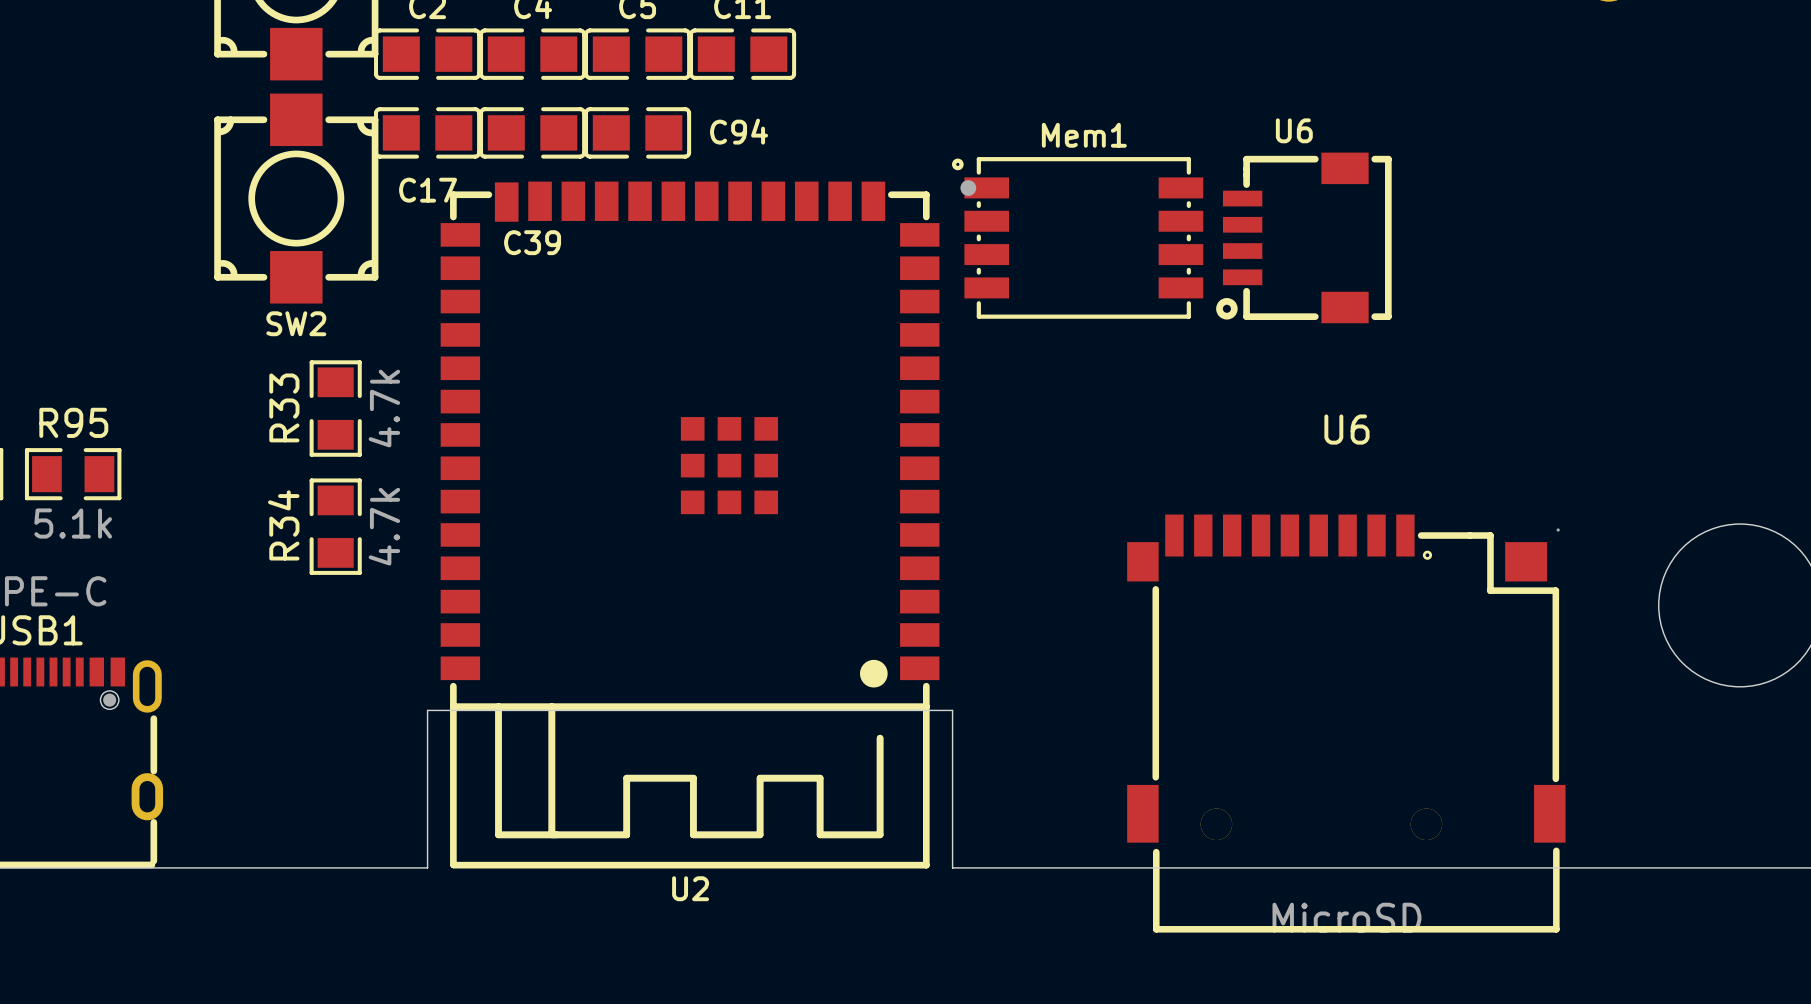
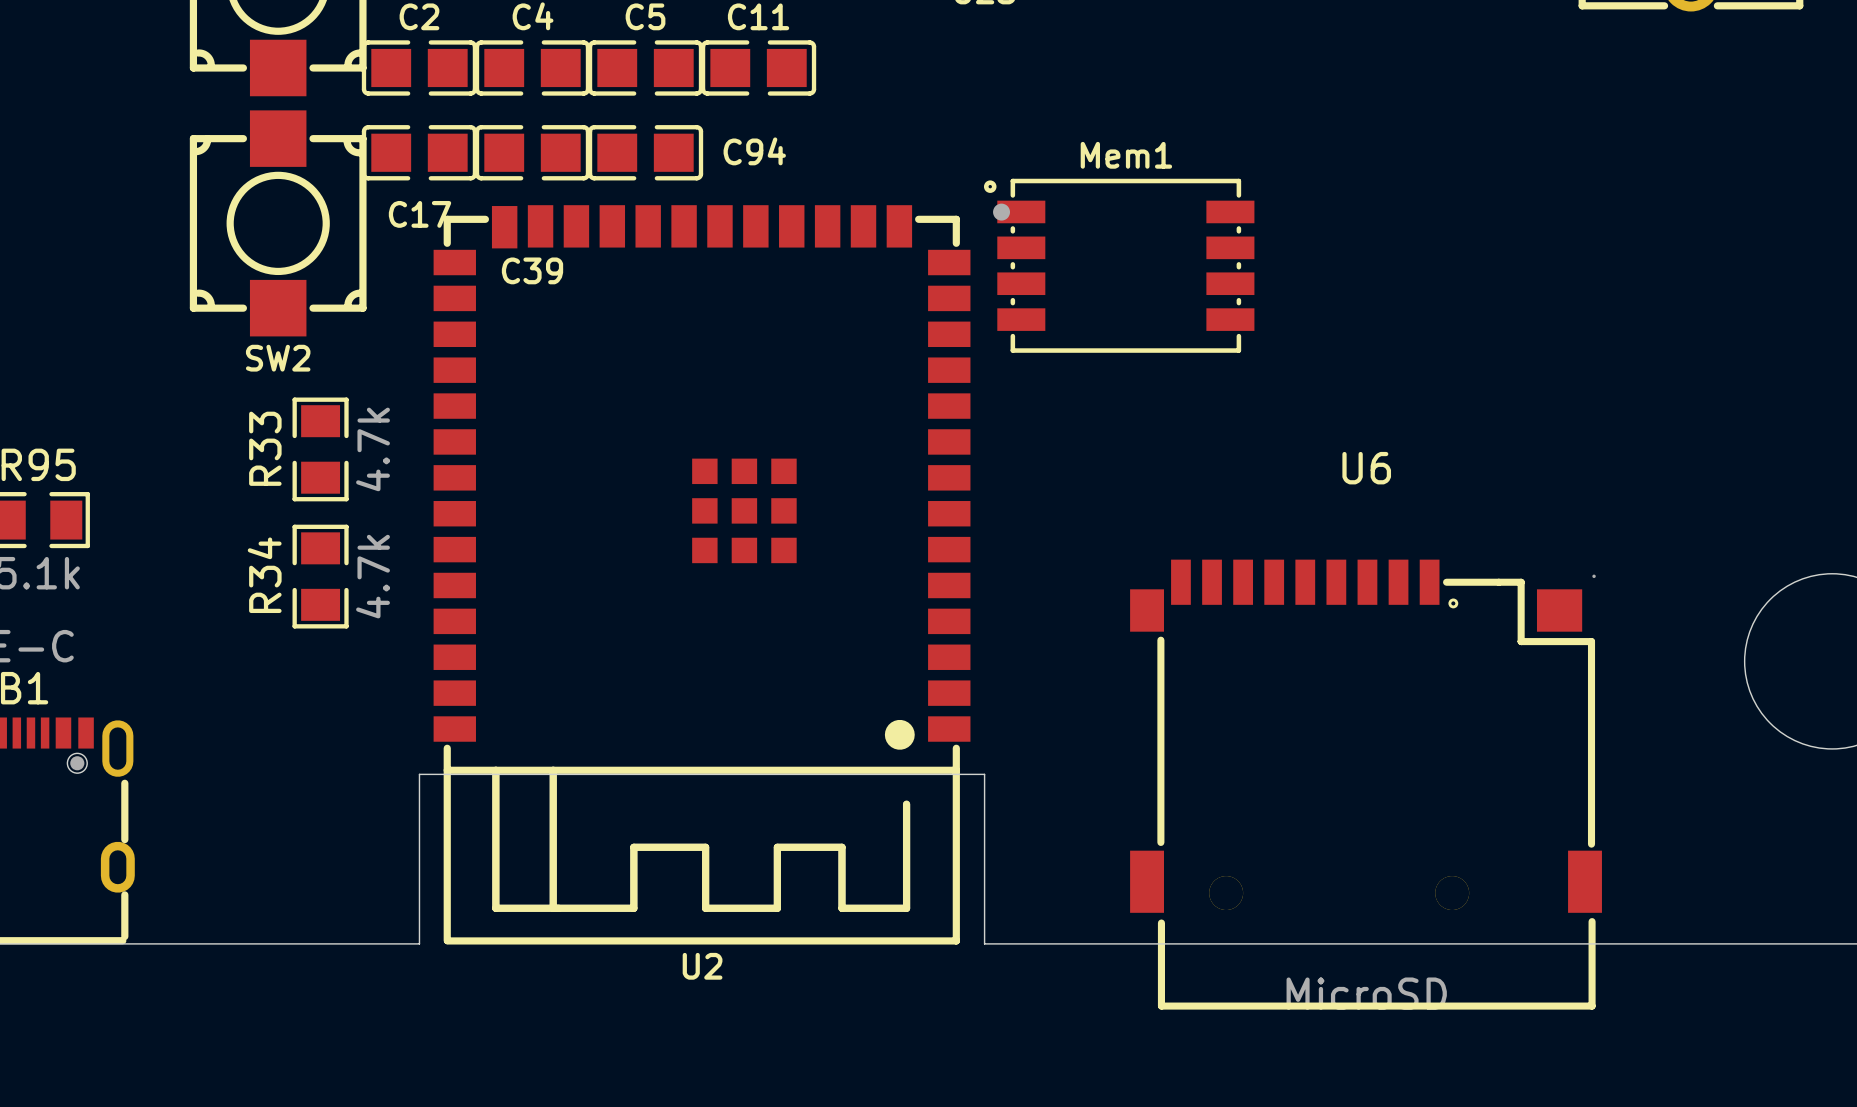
U6: (1303, 237) -> none
U6 position: (1346, 723) -> (1366, 784)

